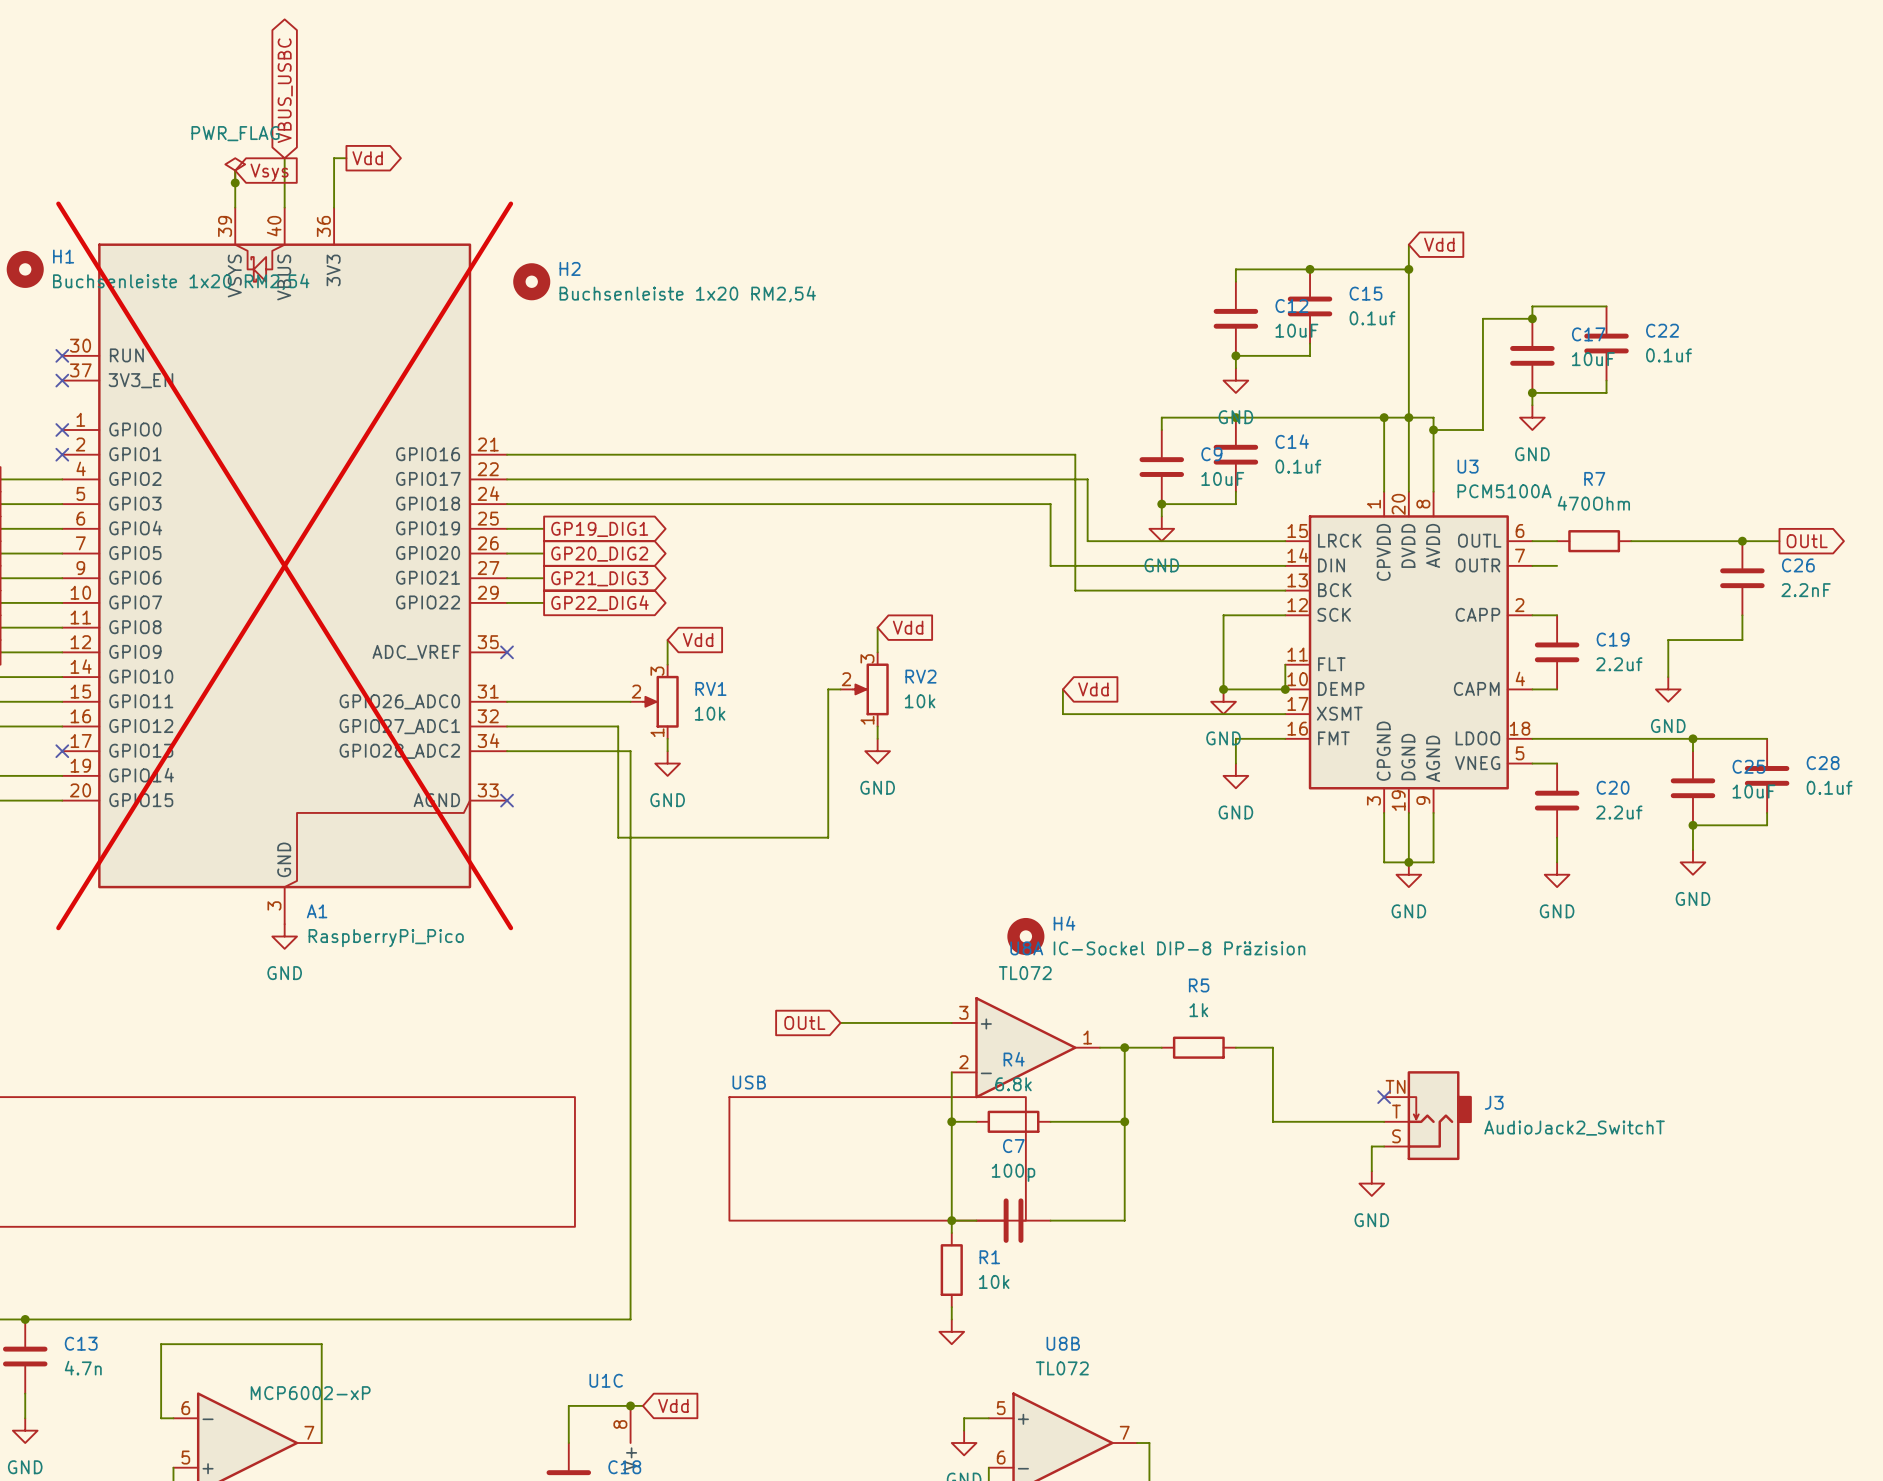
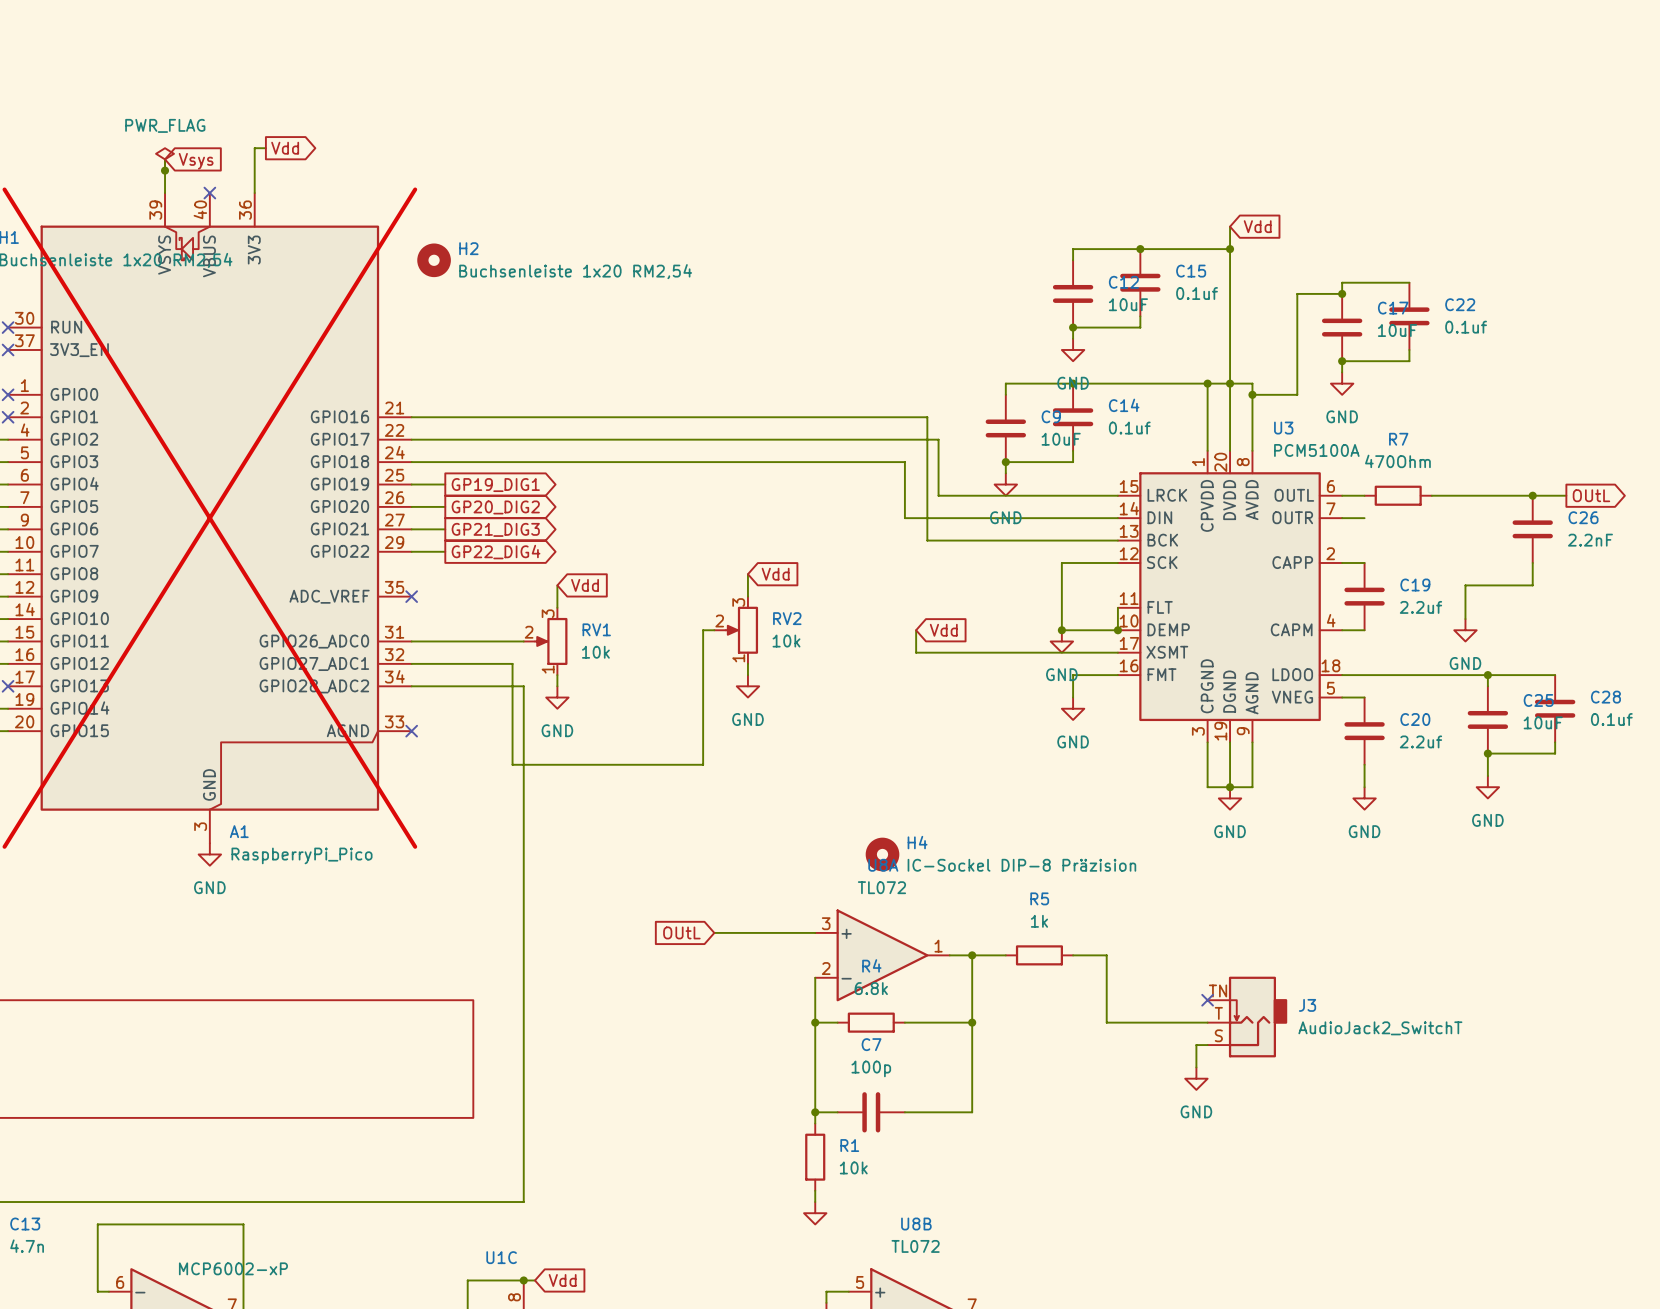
global label: VBUS_USBC (285, 90) -> none
wire: (284, 158) (284, 207) -> none
no-connect mark: none -> (209, 193)
sheet USB: (877, 1158) -> none

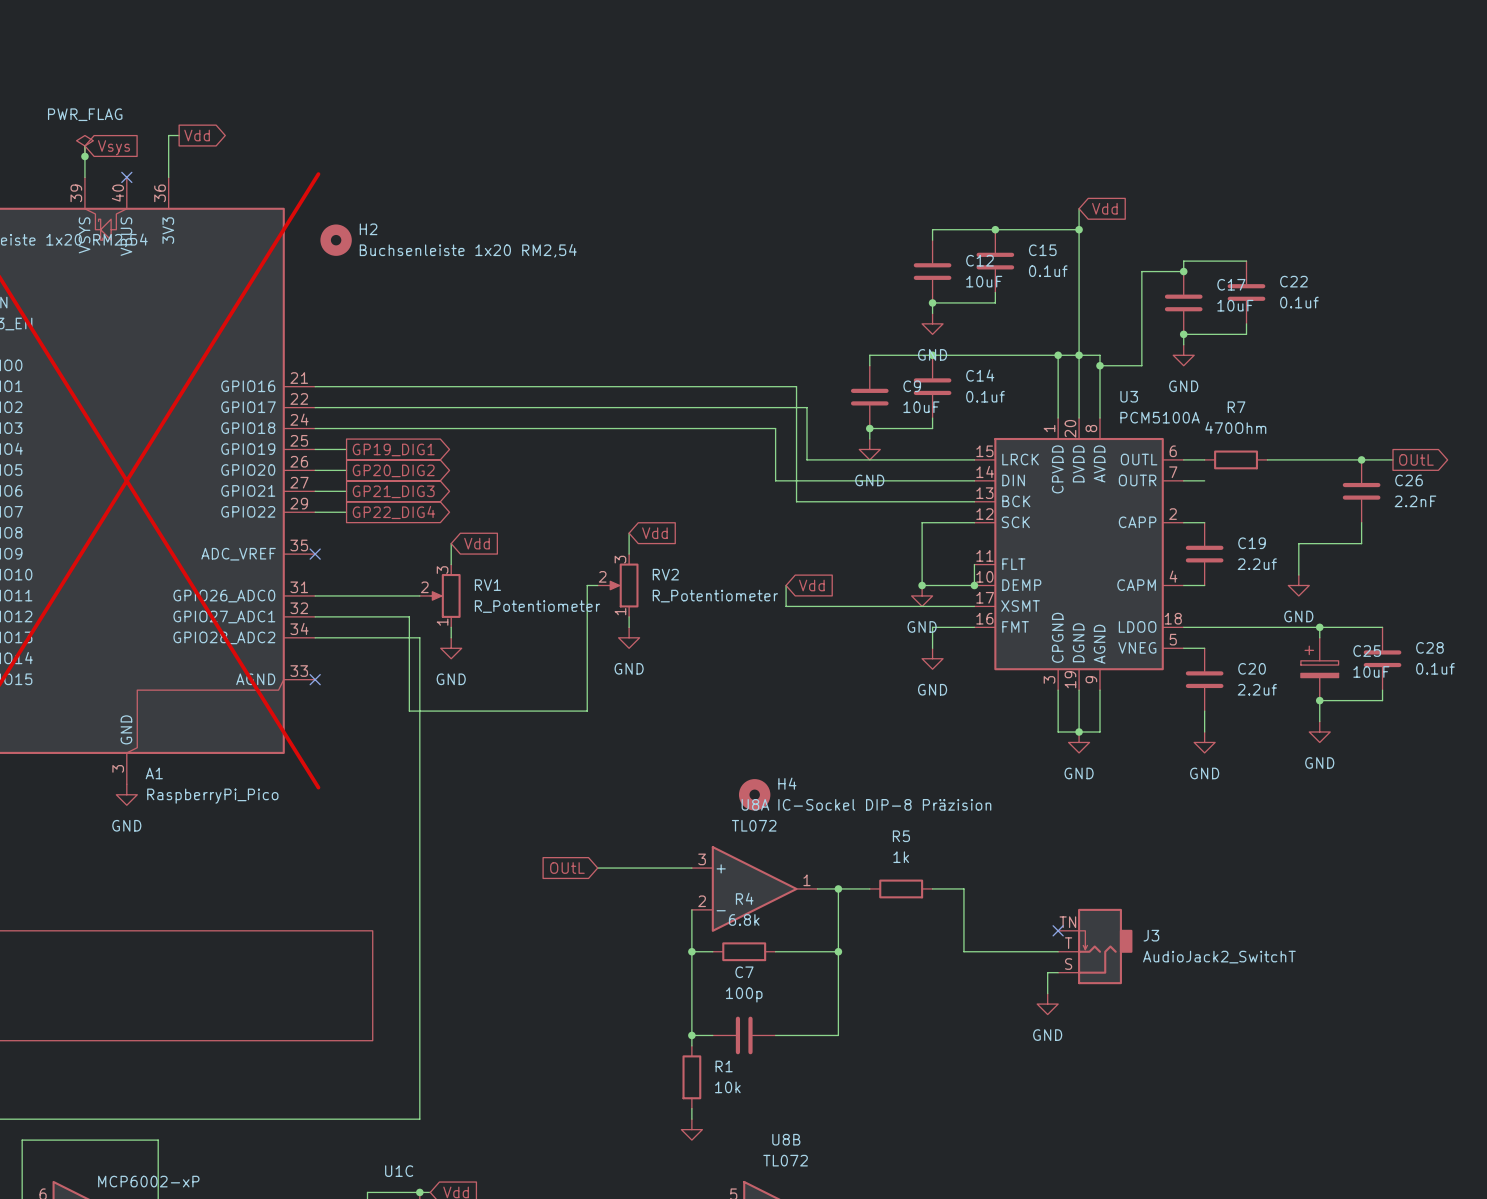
RV2 value: 10k (786, 641) -> R_Potentiometer (715, 596)
RV1 value: 10k (595, 652) -> R_Potentiometer (537, 606)
C25 symbol: [1467, 686, 1509, 754] -> [1300, 637, 1339, 701]

